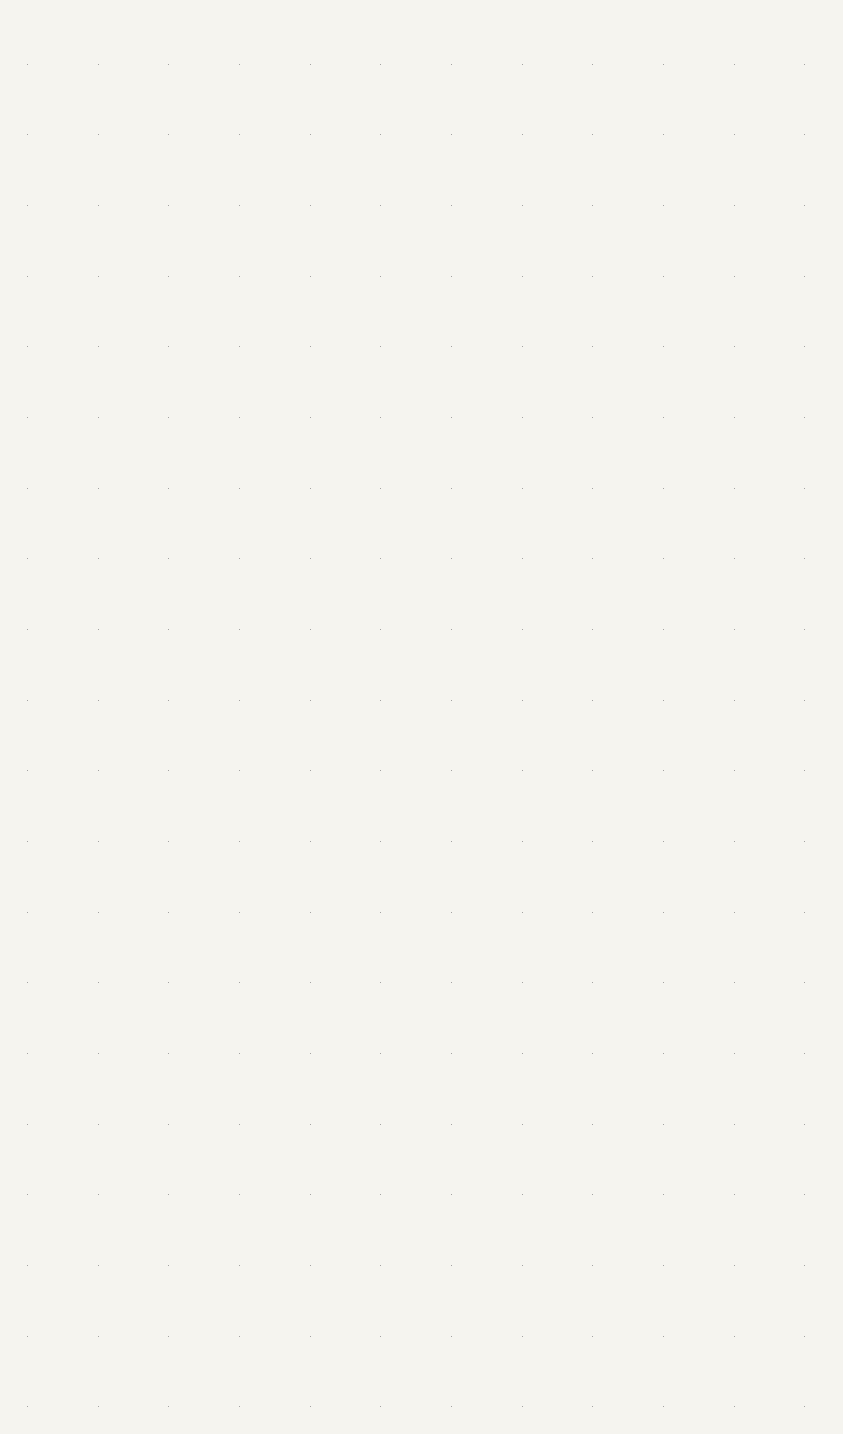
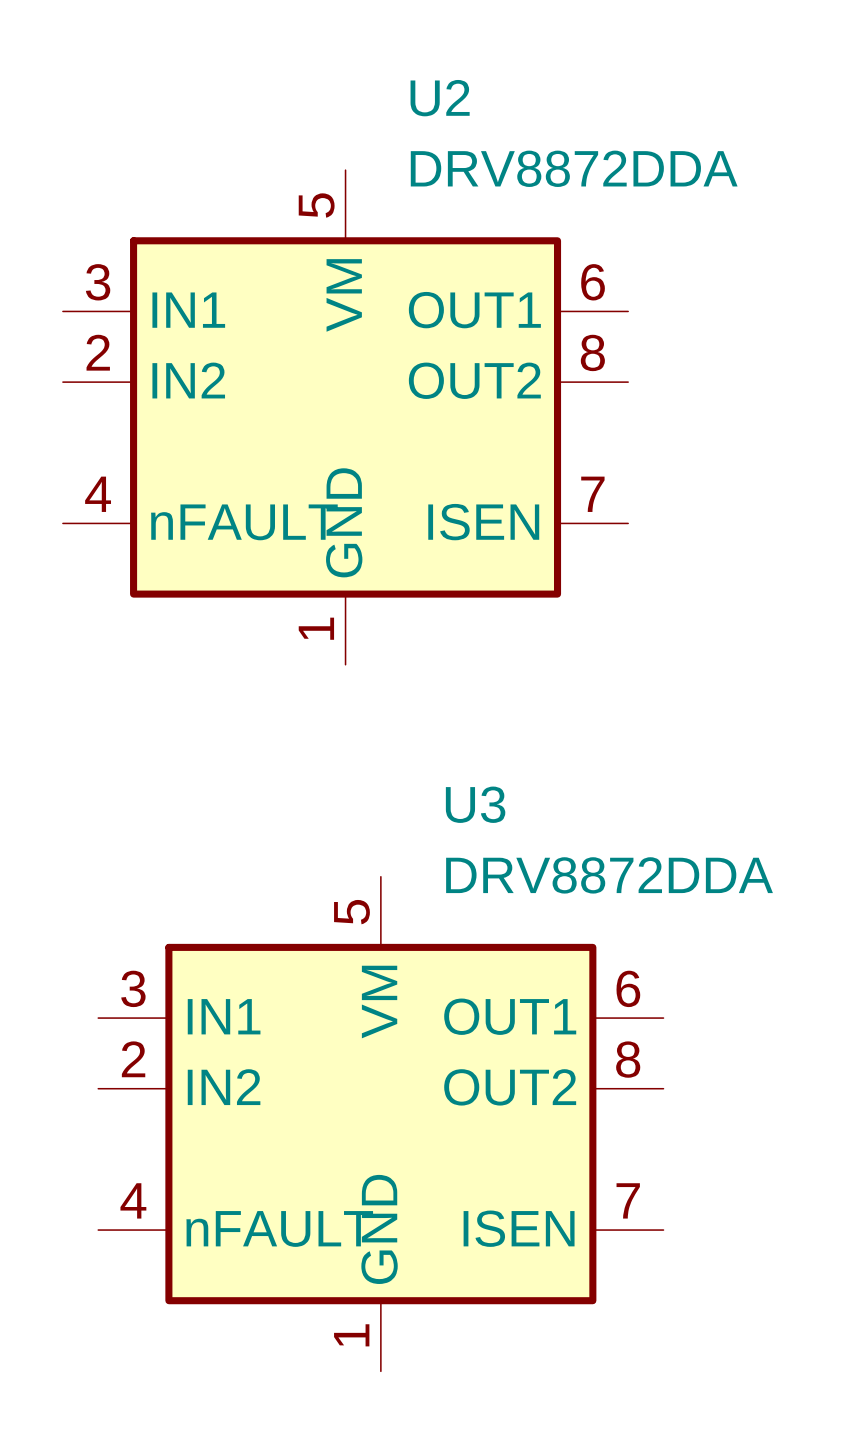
U2: none -> DRV8872DDA (345, 417)
U3: none -> DRV8872DDA (380, 1124)

